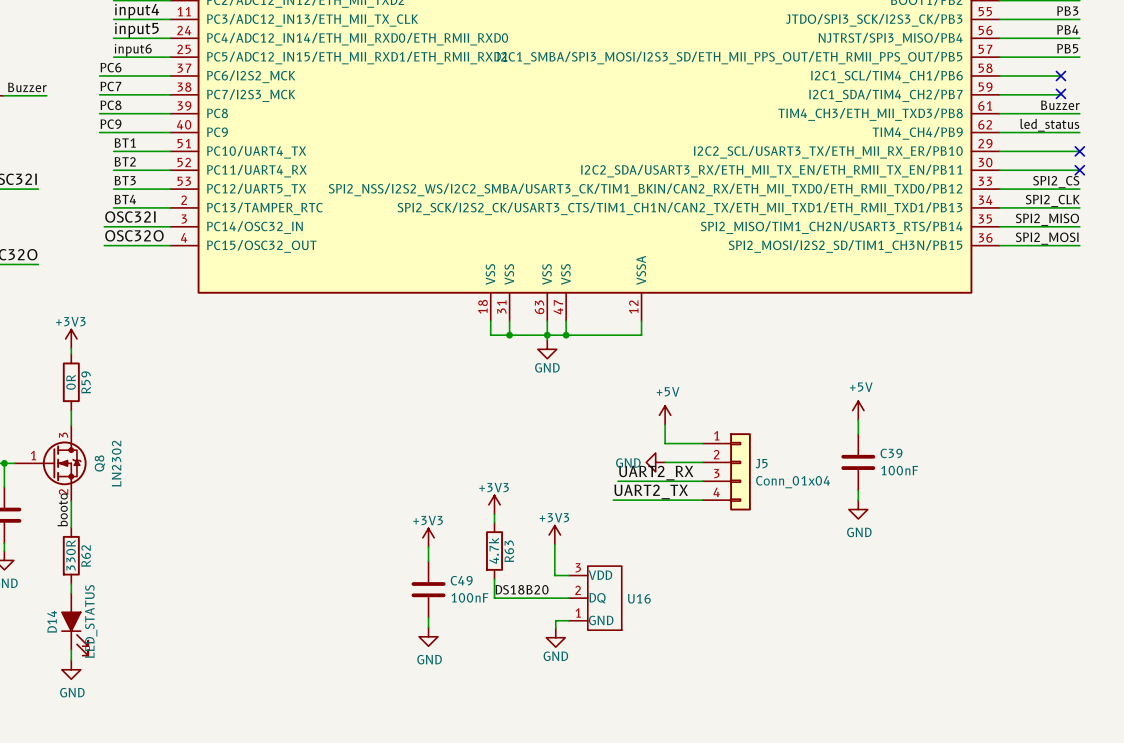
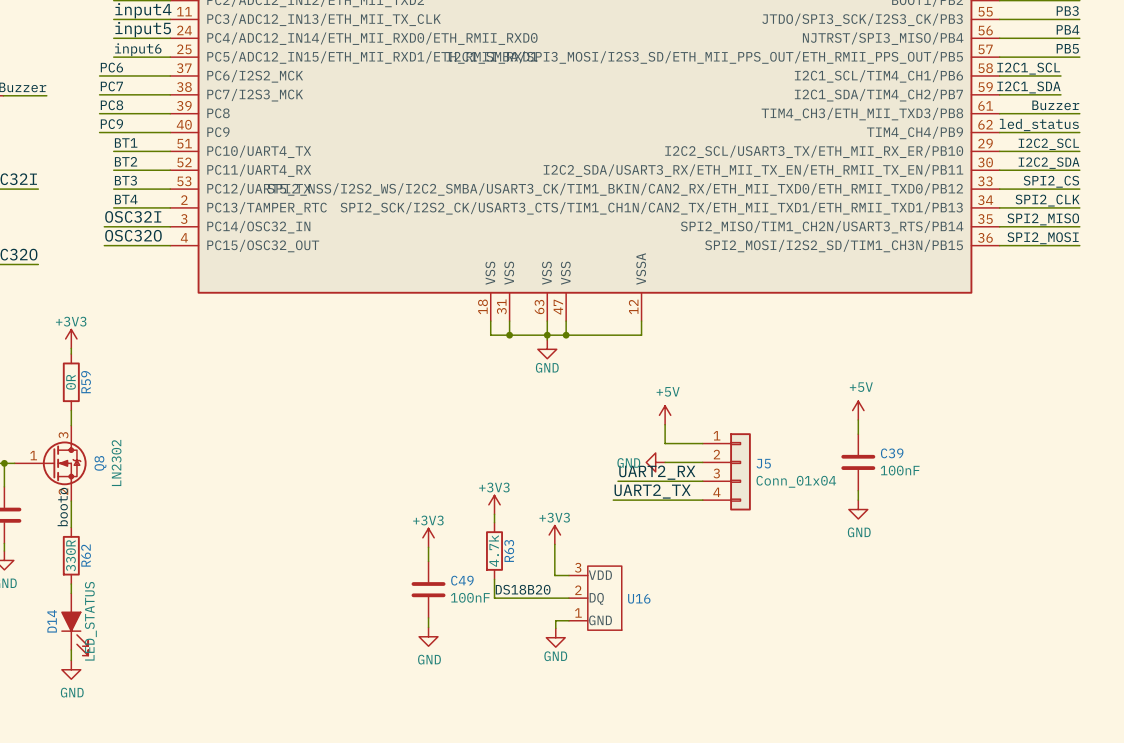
label: none -> I2C1_SCL (1028, 68)
no-connect mark: (1060, 75) -> none
label: none -> I2C1_SDA (1028, 87)
no-connect mark: (1060, 93) -> none
label: none -> I2C2_SCL (1048, 144)
no-connect mark: (1079, 151) -> none
label: none -> I2C2_SDA (1049, 163)
no-connect mark: (1079, 170) -> none

